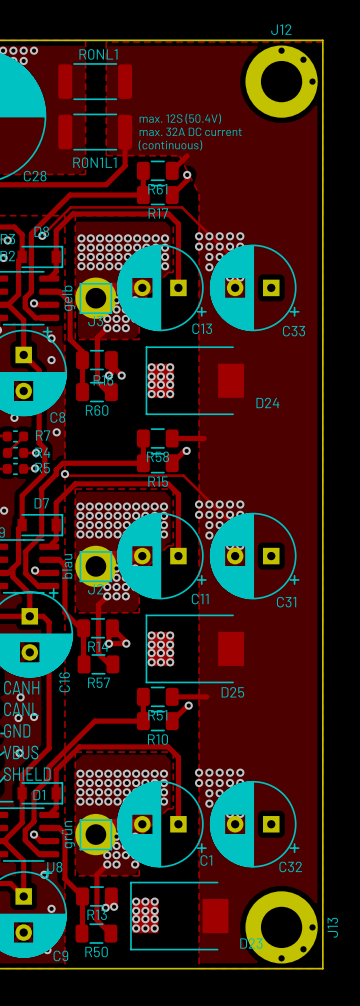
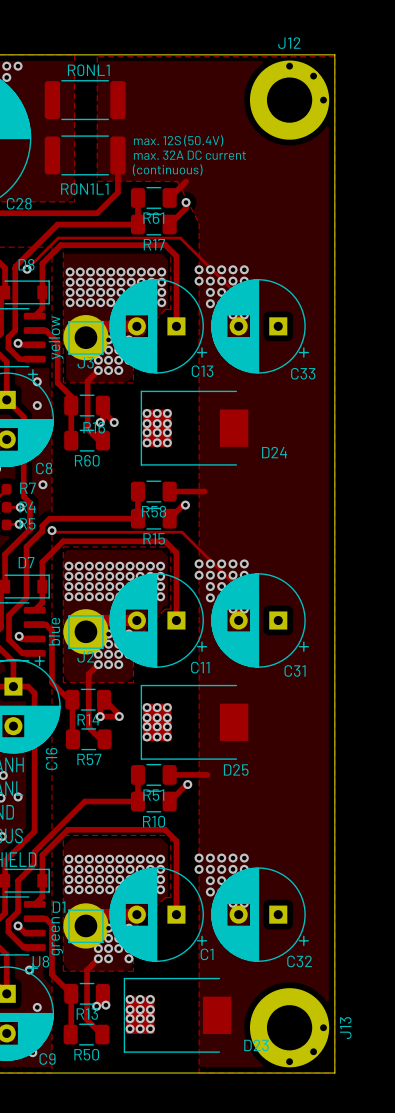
text: gelb (68, 298) -> yellow (56, 337)
text: blau (67, 566) -> blue (54, 631)
D1 name position: D1 (39, 794) -> D1 (59, 907)
text: grün (68, 834) -> green (57, 936)

